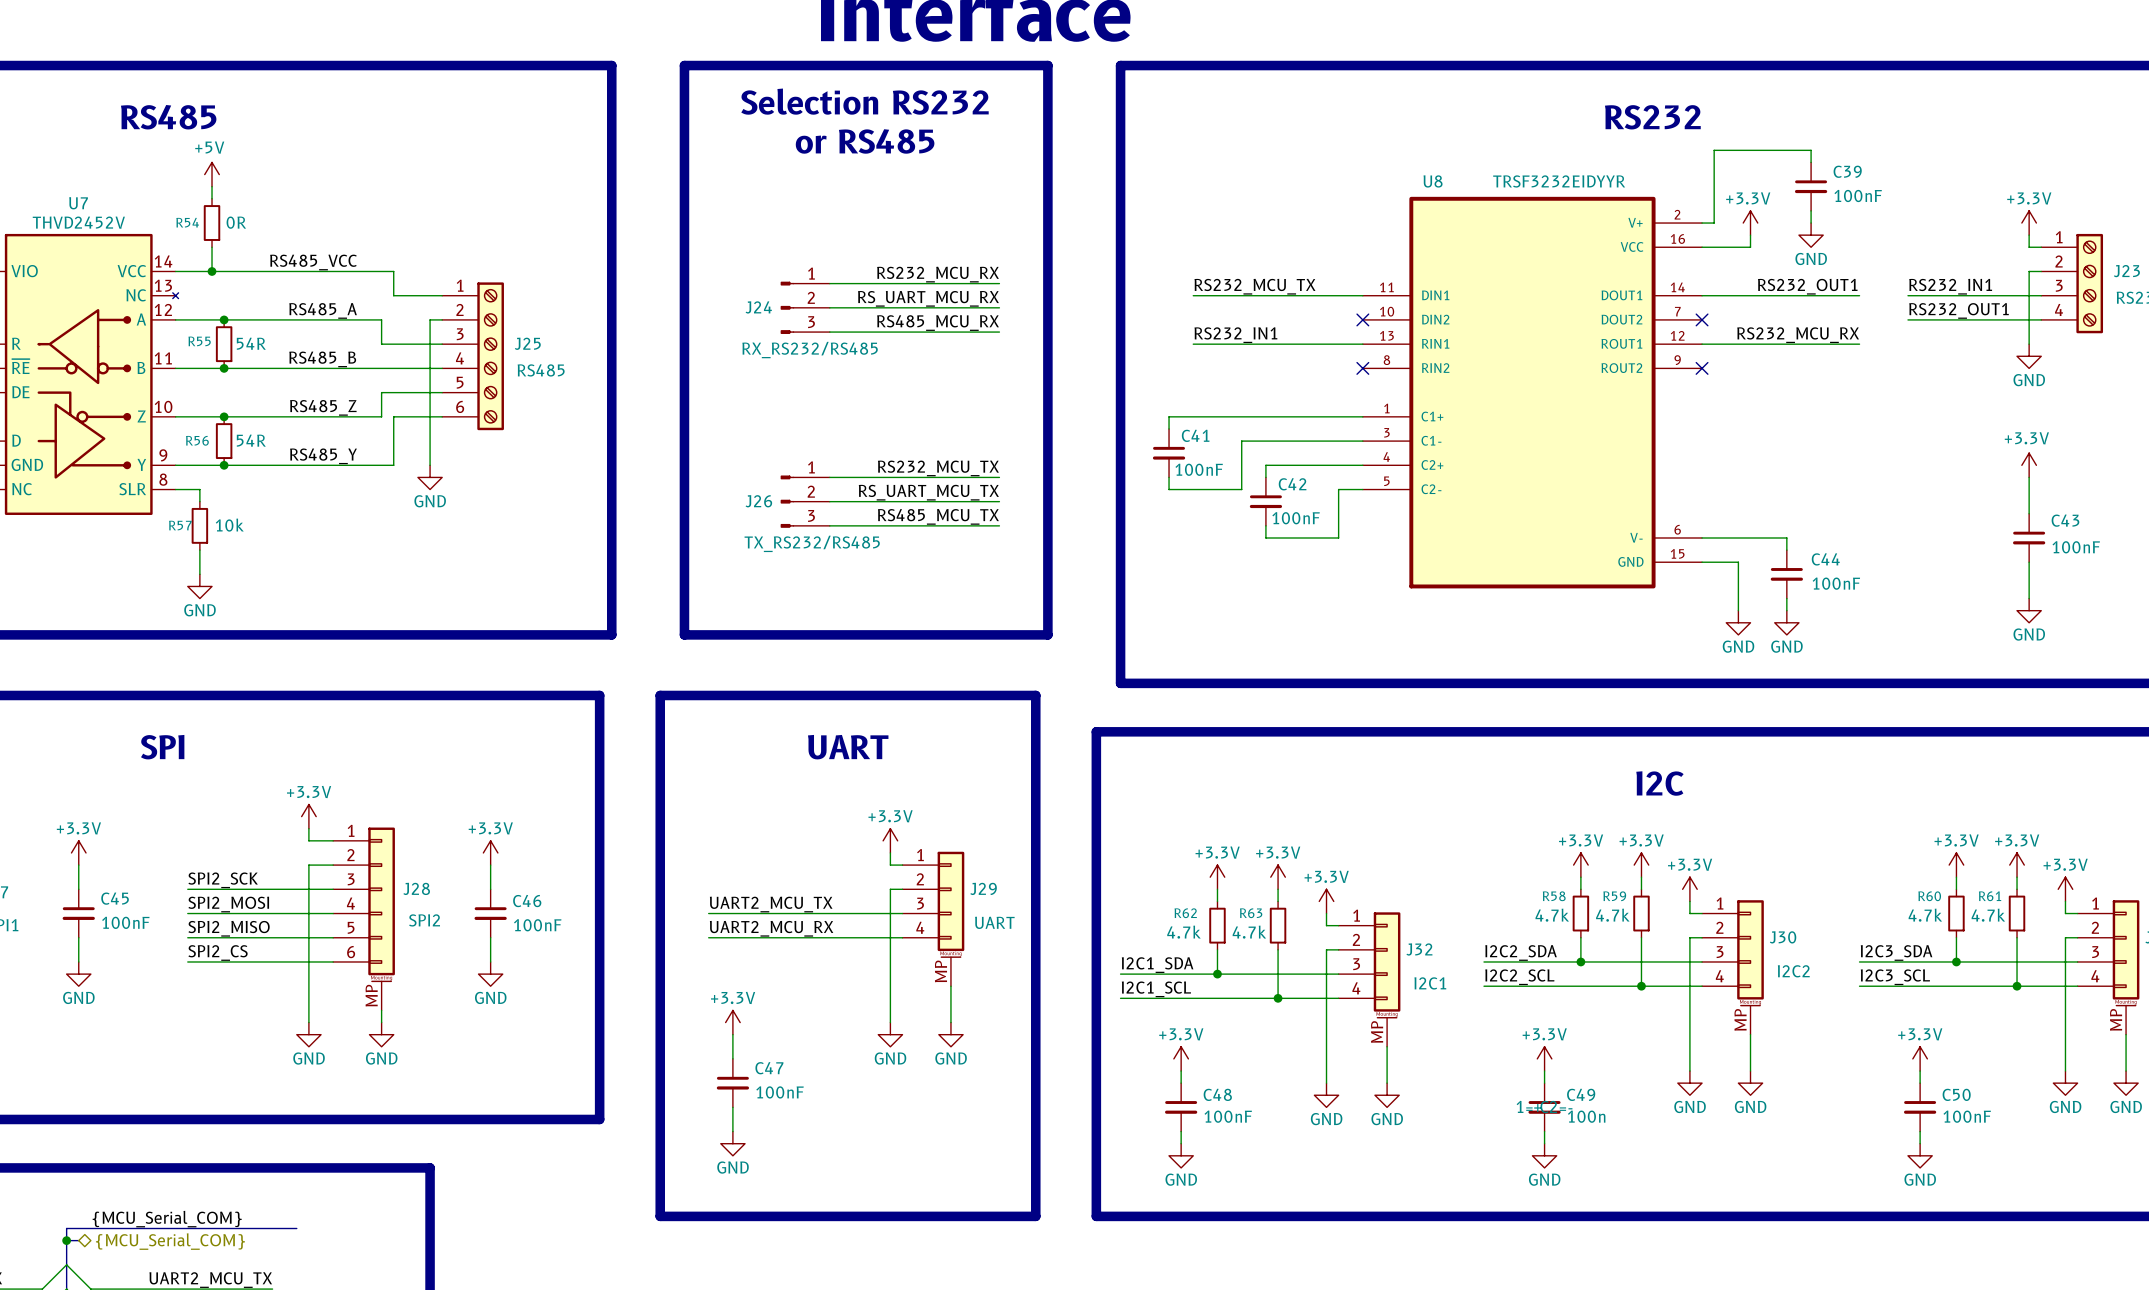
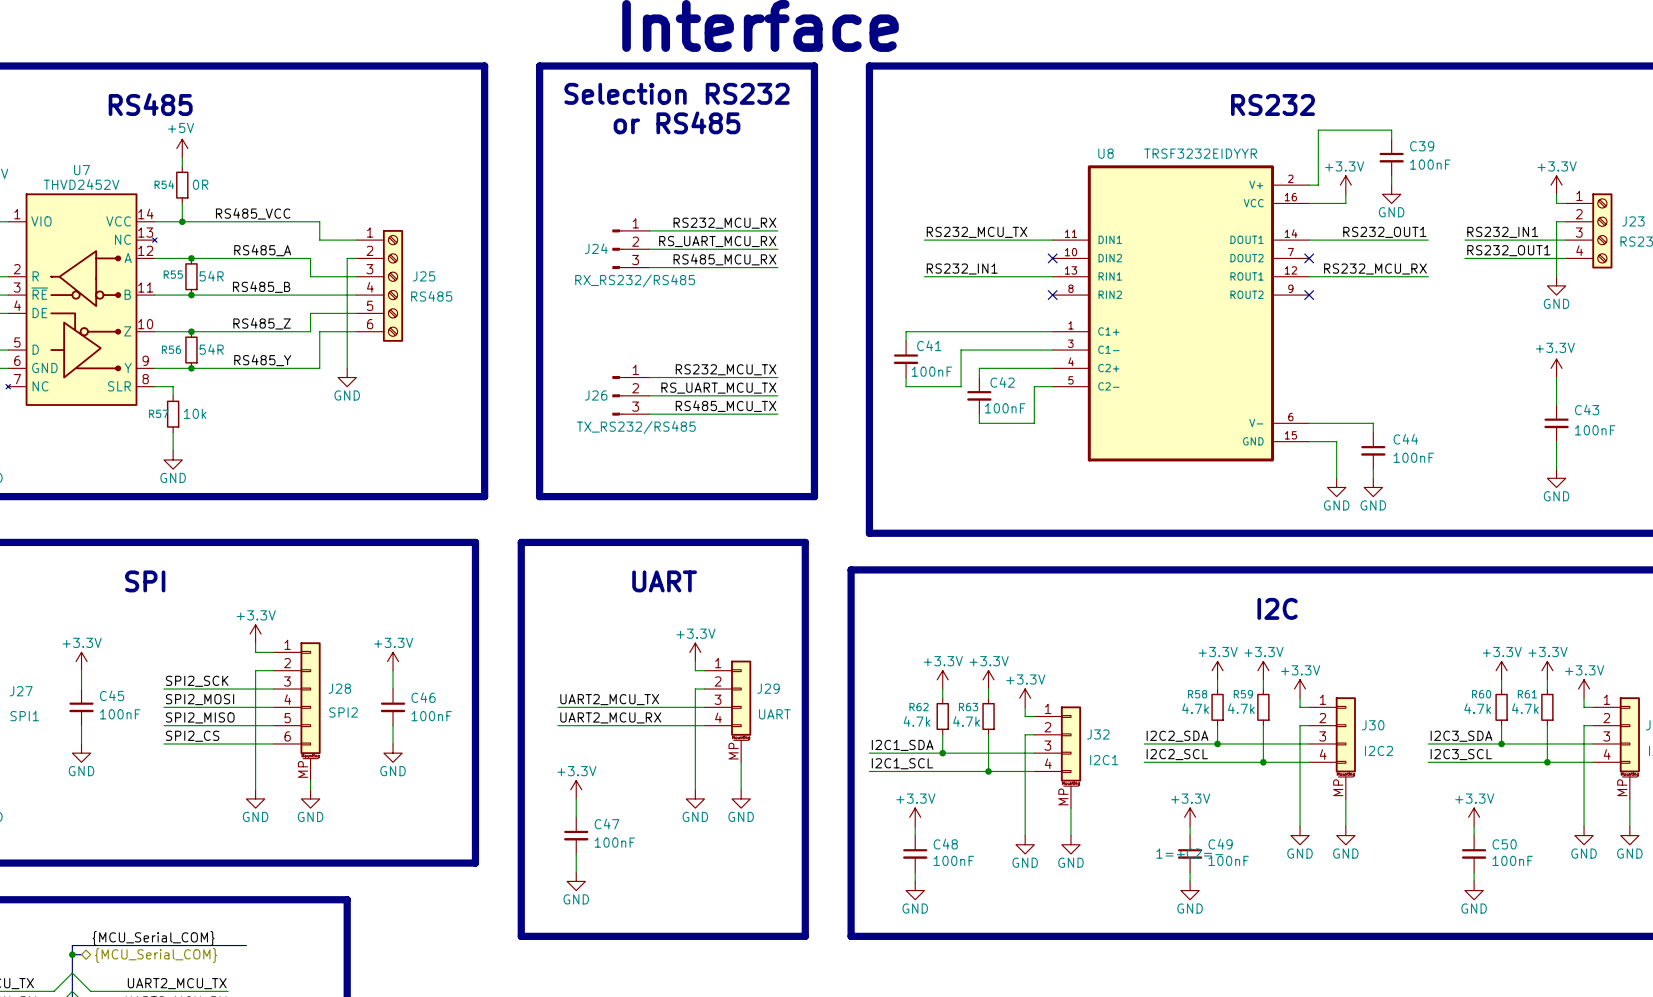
C49 value: 100n (1586, 1116) -> 100nF (1228, 860)

